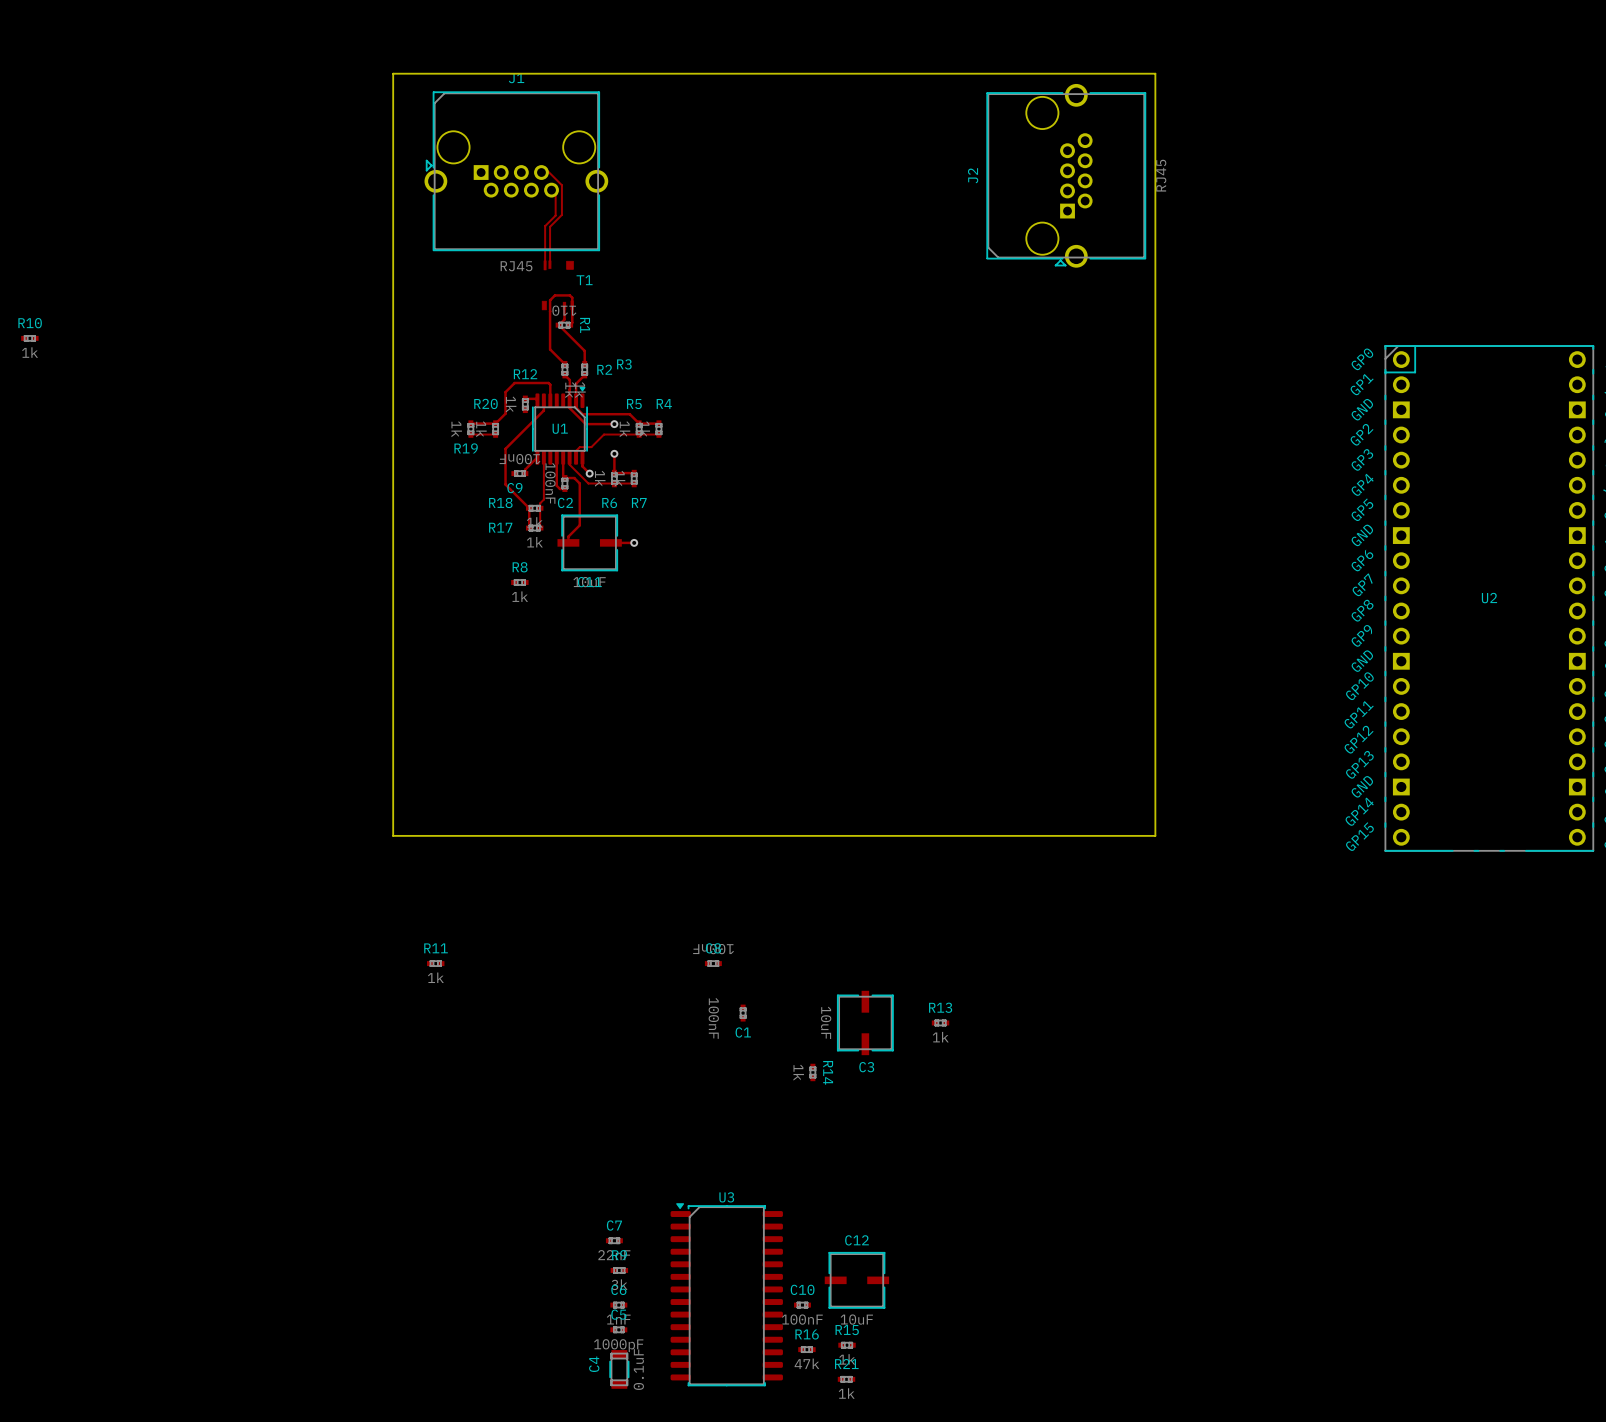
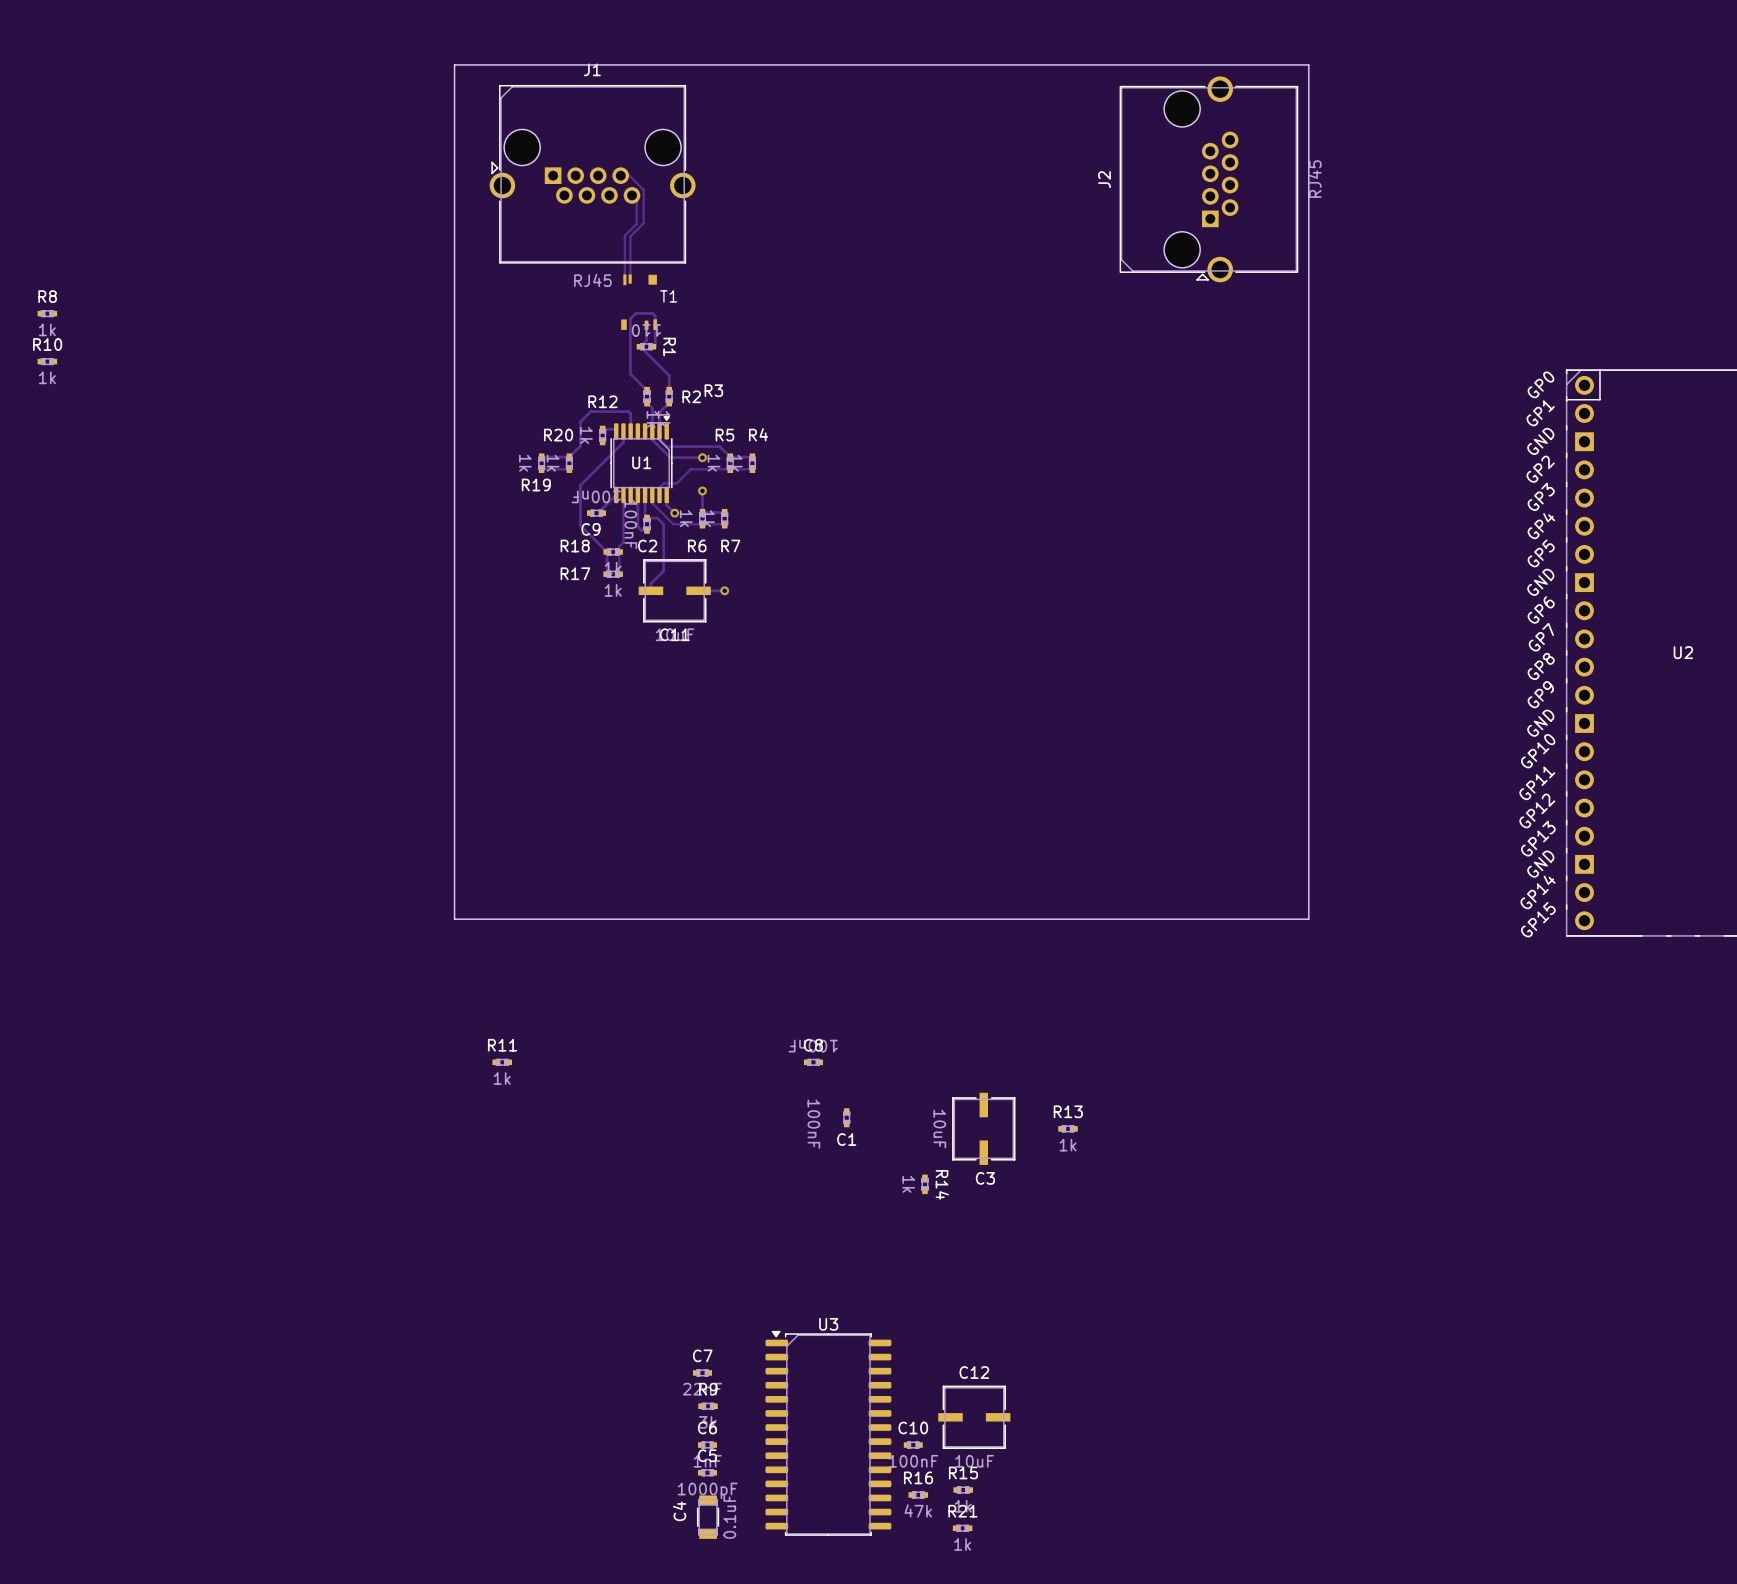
R8 position: (519, 582) -> (47, 313)

